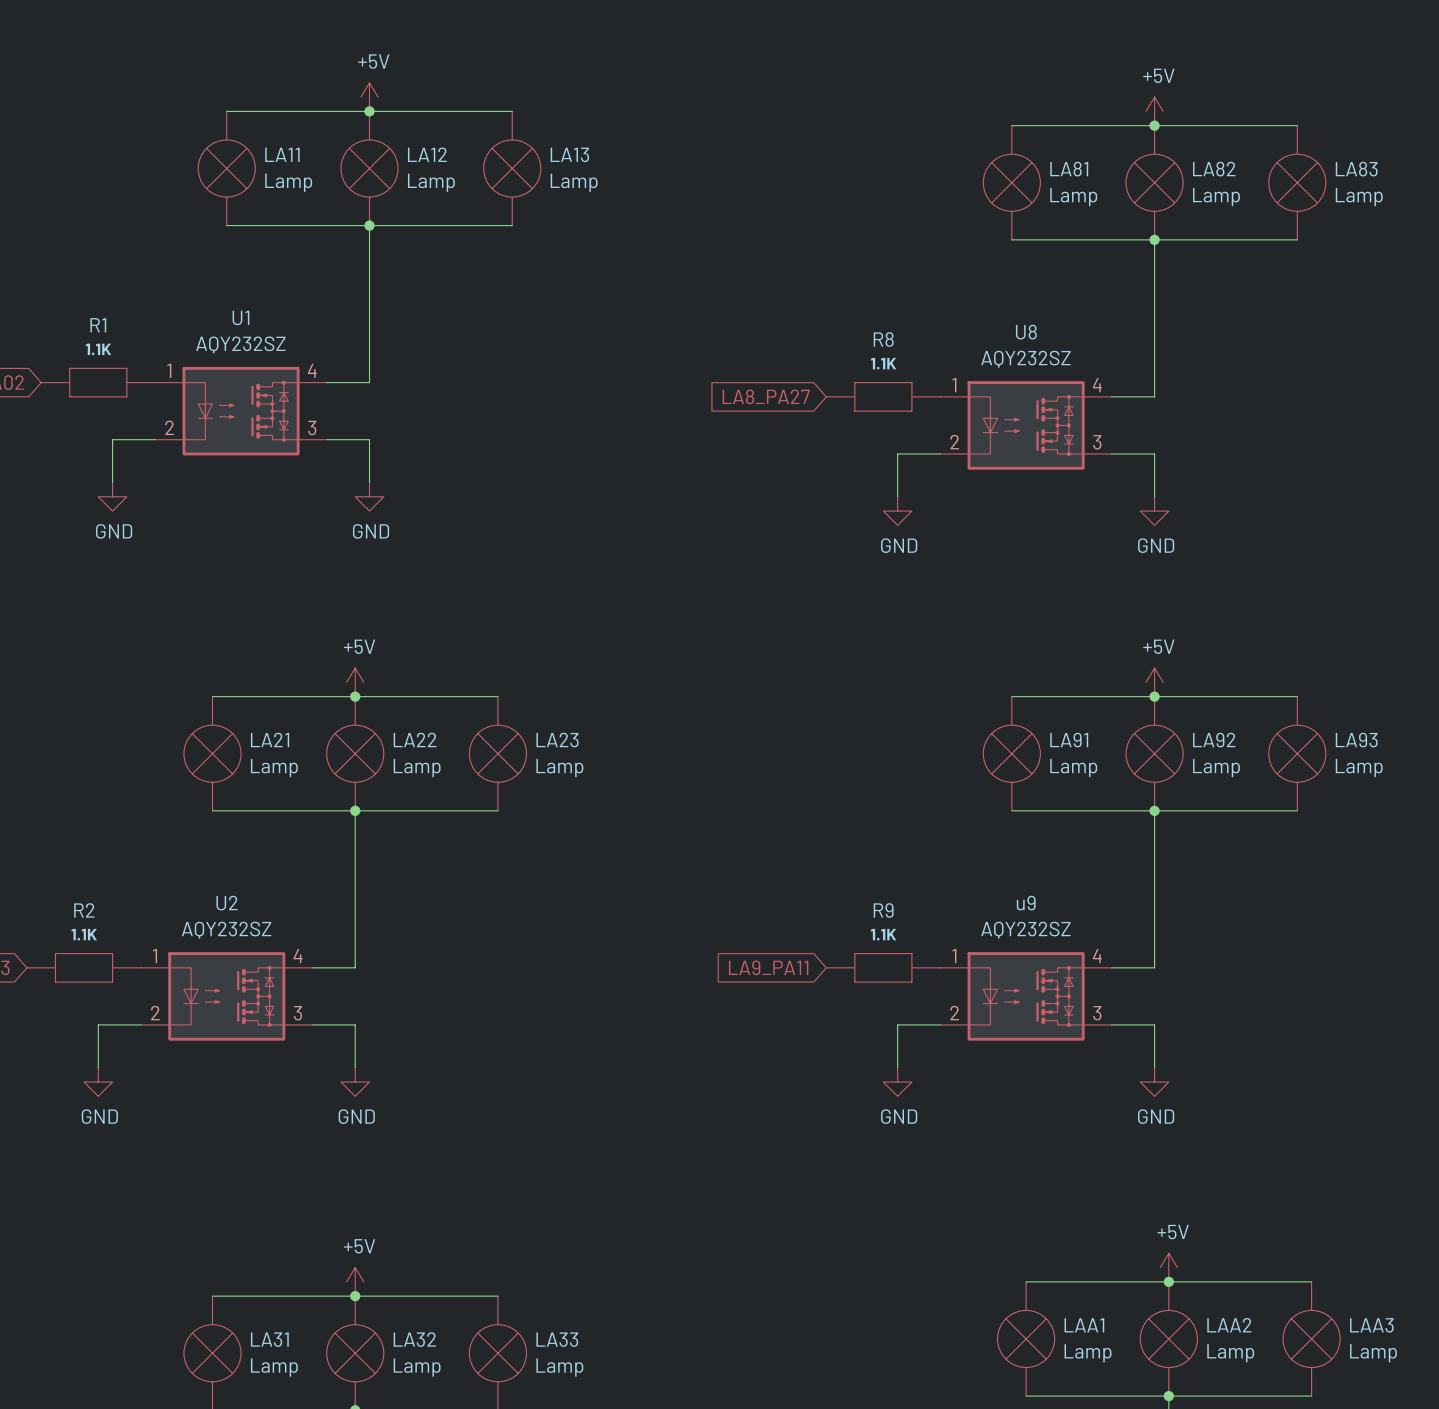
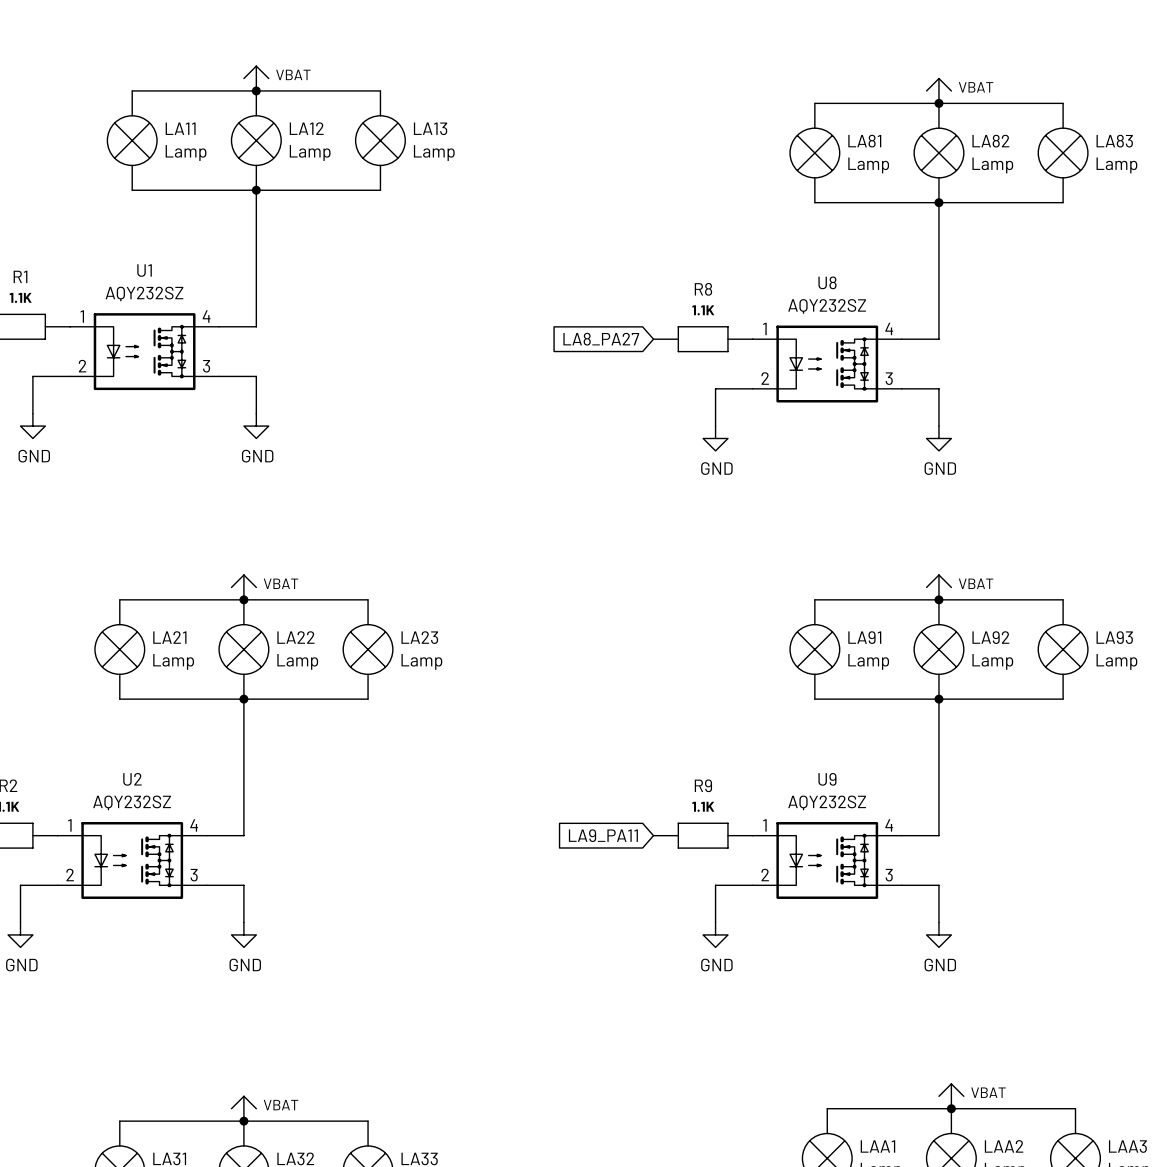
power symbol: +5V (369, 97) -> VBAT (256, 78)
power symbol: +5V (1154, 111) -> VBAT (938, 90)
power symbol: +5V (355, 682) -> VBAT (243, 587)
power symbol: +5V (1154, 682) -> VBAT (938, 587)
u9 name: u9 (1026, 903) -> U9 (827, 779)
power symbol: +5V (1168, 1267) -> VBAT (951, 1096)
power symbol: +5V (355, 1281) -> VBAT (243, 1108)

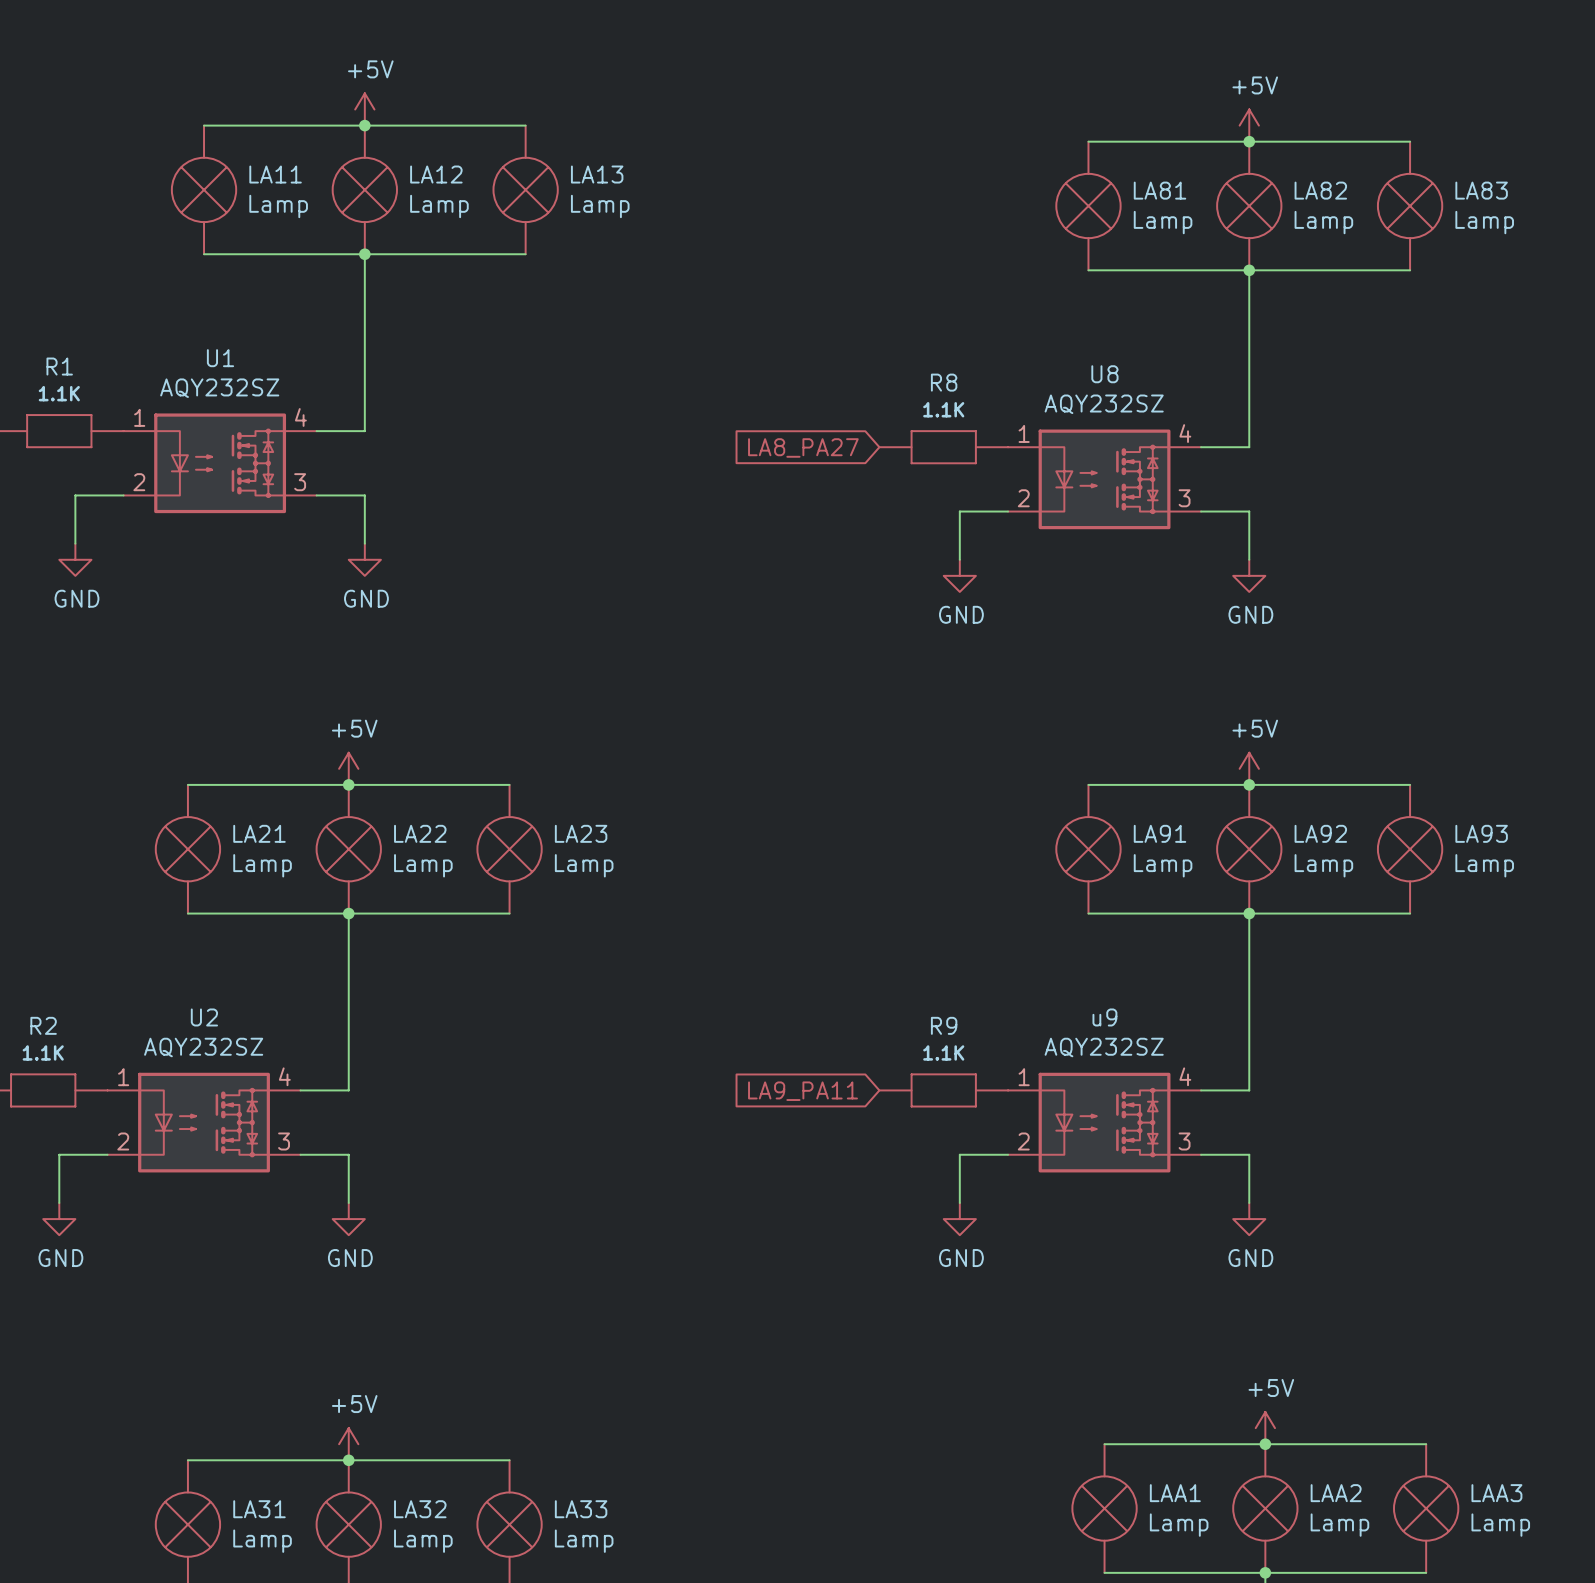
power symbol: VBAT (256, 78) -> +5V (364, 109)
power symbol: VBAT (938, 90) -> +5V (1249, 125)
power symbol: VBAT (243, 587) -> +5V (348, 768)
power symbol: VBAT (938, 587) -> +5V (1249, 768)
U9 name: U9 (827, 779) -> u9 (1104, 1017)
power symbol: VBAT (951, 1096) -> +5V (1265, 1428)
power symbol: VBAT (243, 1108) -> +5V (348, 1444)

